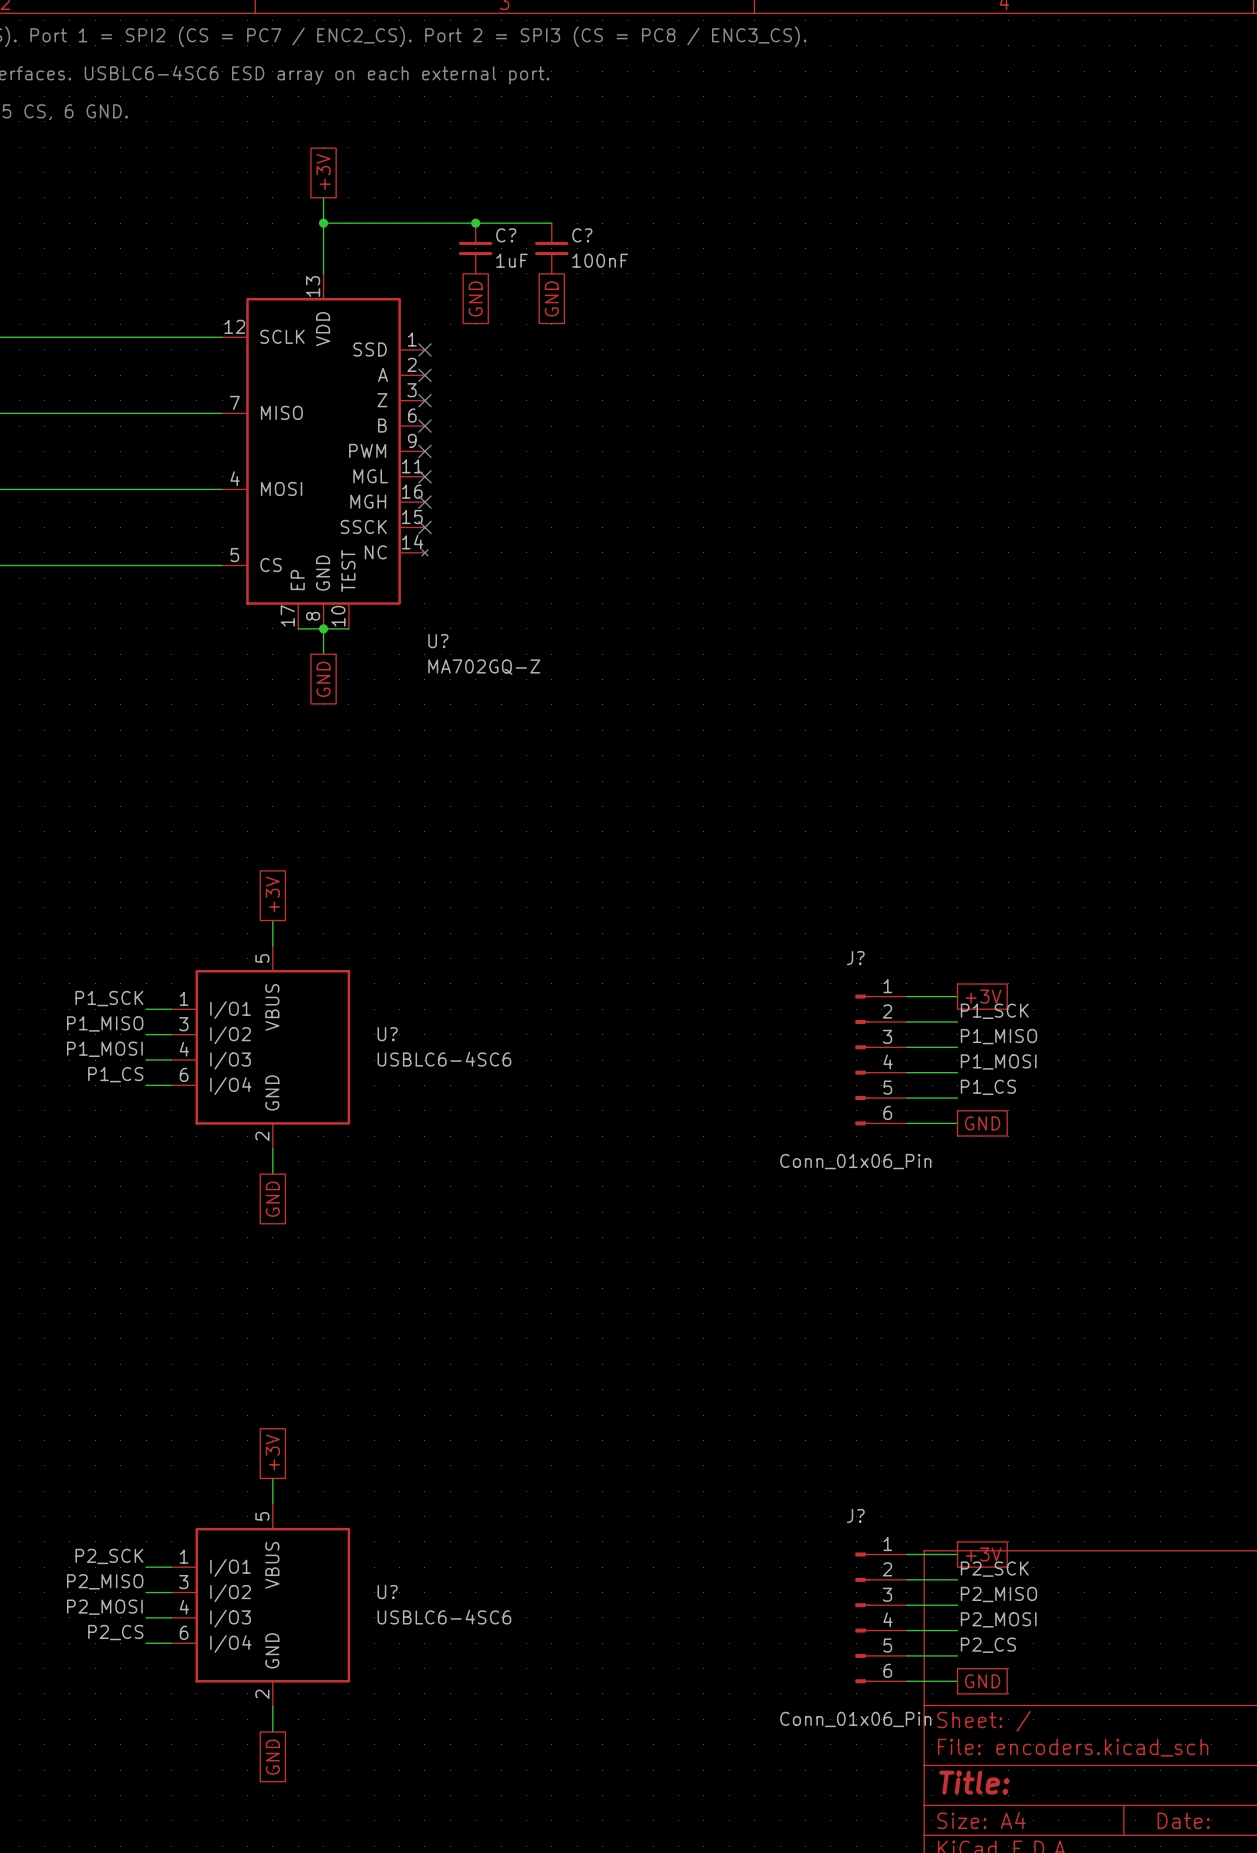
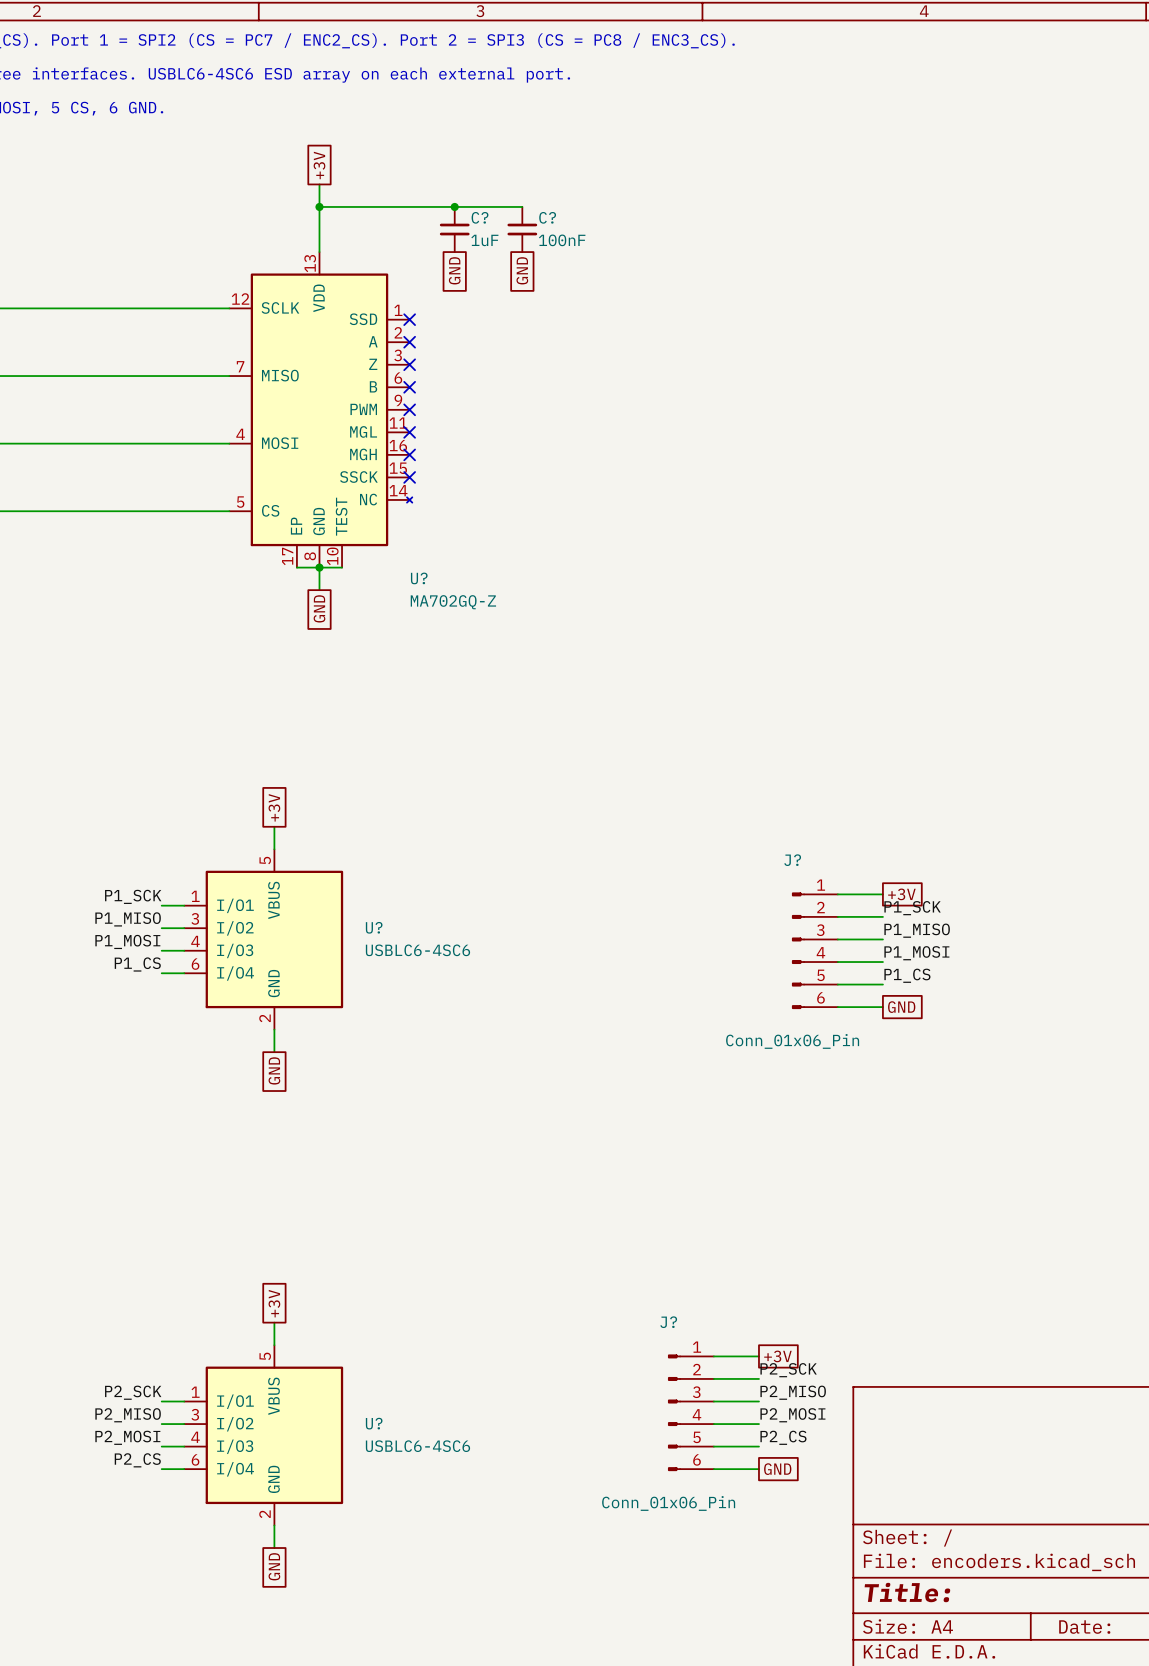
wire: (906, 1554) (957, 1554) -> (713, 1356) (758, 1356)
global label position: +3V (983, 1554) -> +3V (777, 1356)
label position: P2_SCK (994, 1569) -> P2_SCK (788, 1370)
wire: (906, 1579) (957, 1579) -> (713, 1378) (758, 1378)
label position: P2_MISO (998, 1594) -> P2_MISO (793, 1392)
wire: (906, 1605) (957, 1605) -> (713, 1401) (758, 1401)
J? position: (881, 1617) -> (691, 1412)
label position: P2_MOSI (998, 1619) -> P2_MOSI (792, 1415)
wire: (906, 1630) (957, 1630) -> (713, 1424) (758, 1424)
label position: P2_CS (988, 1645) -> P2_CS (783, 1437)
wire: (906, 1655) (957, 1655) -> (713, 1446) (758, 1446)
wire: (906, 1681) (957, 1681) -> (713, 1469) (758, 1469)
global label position: GND (982, 1681) -> GND (777, 1469)

